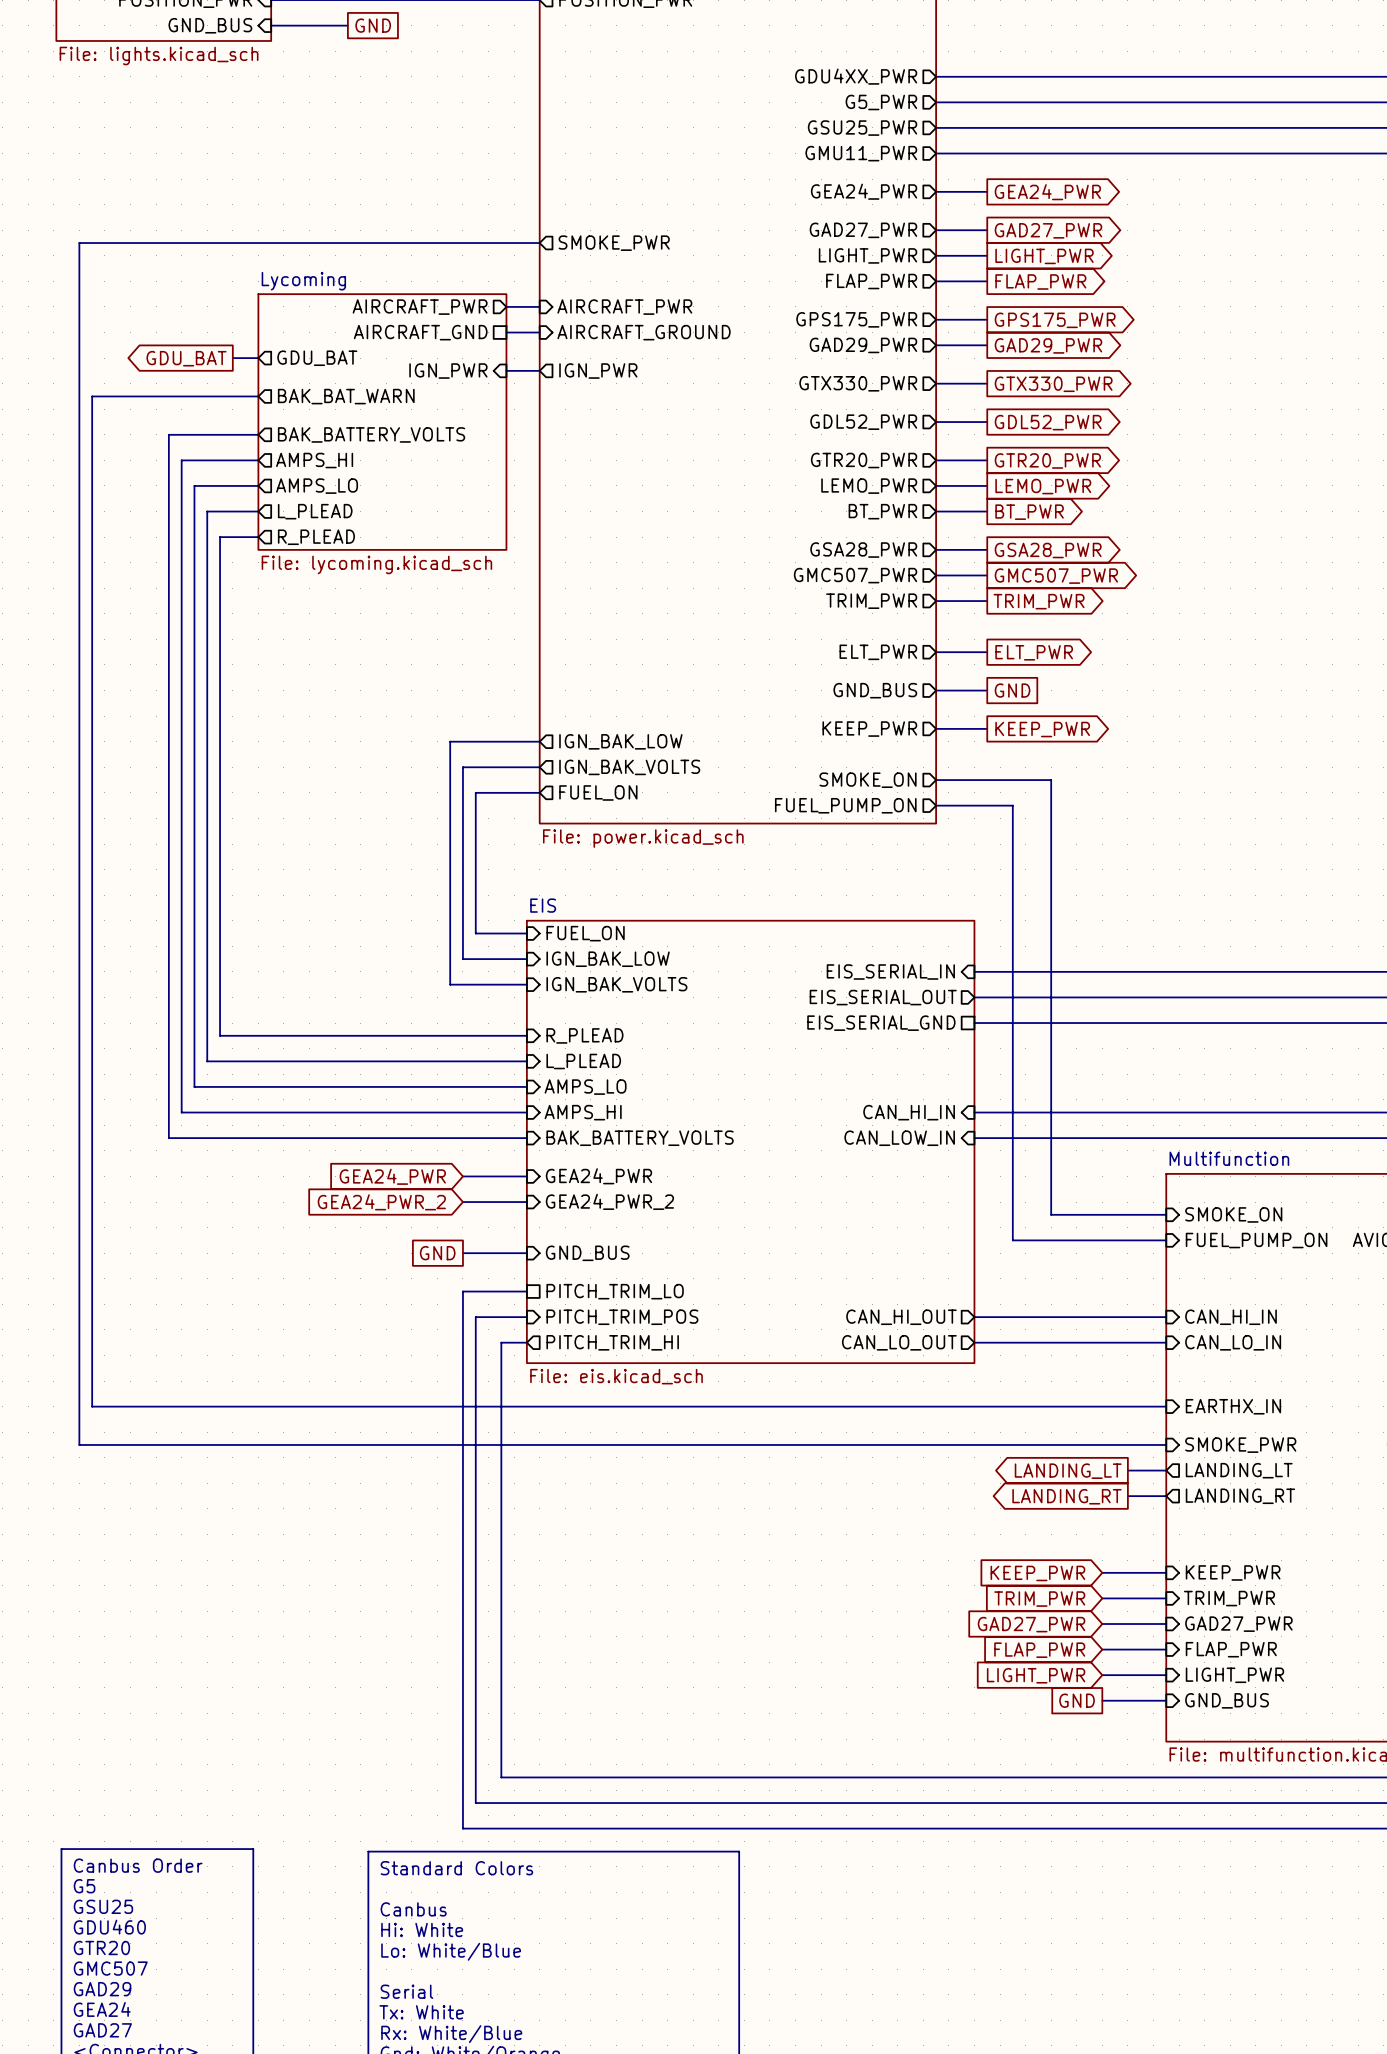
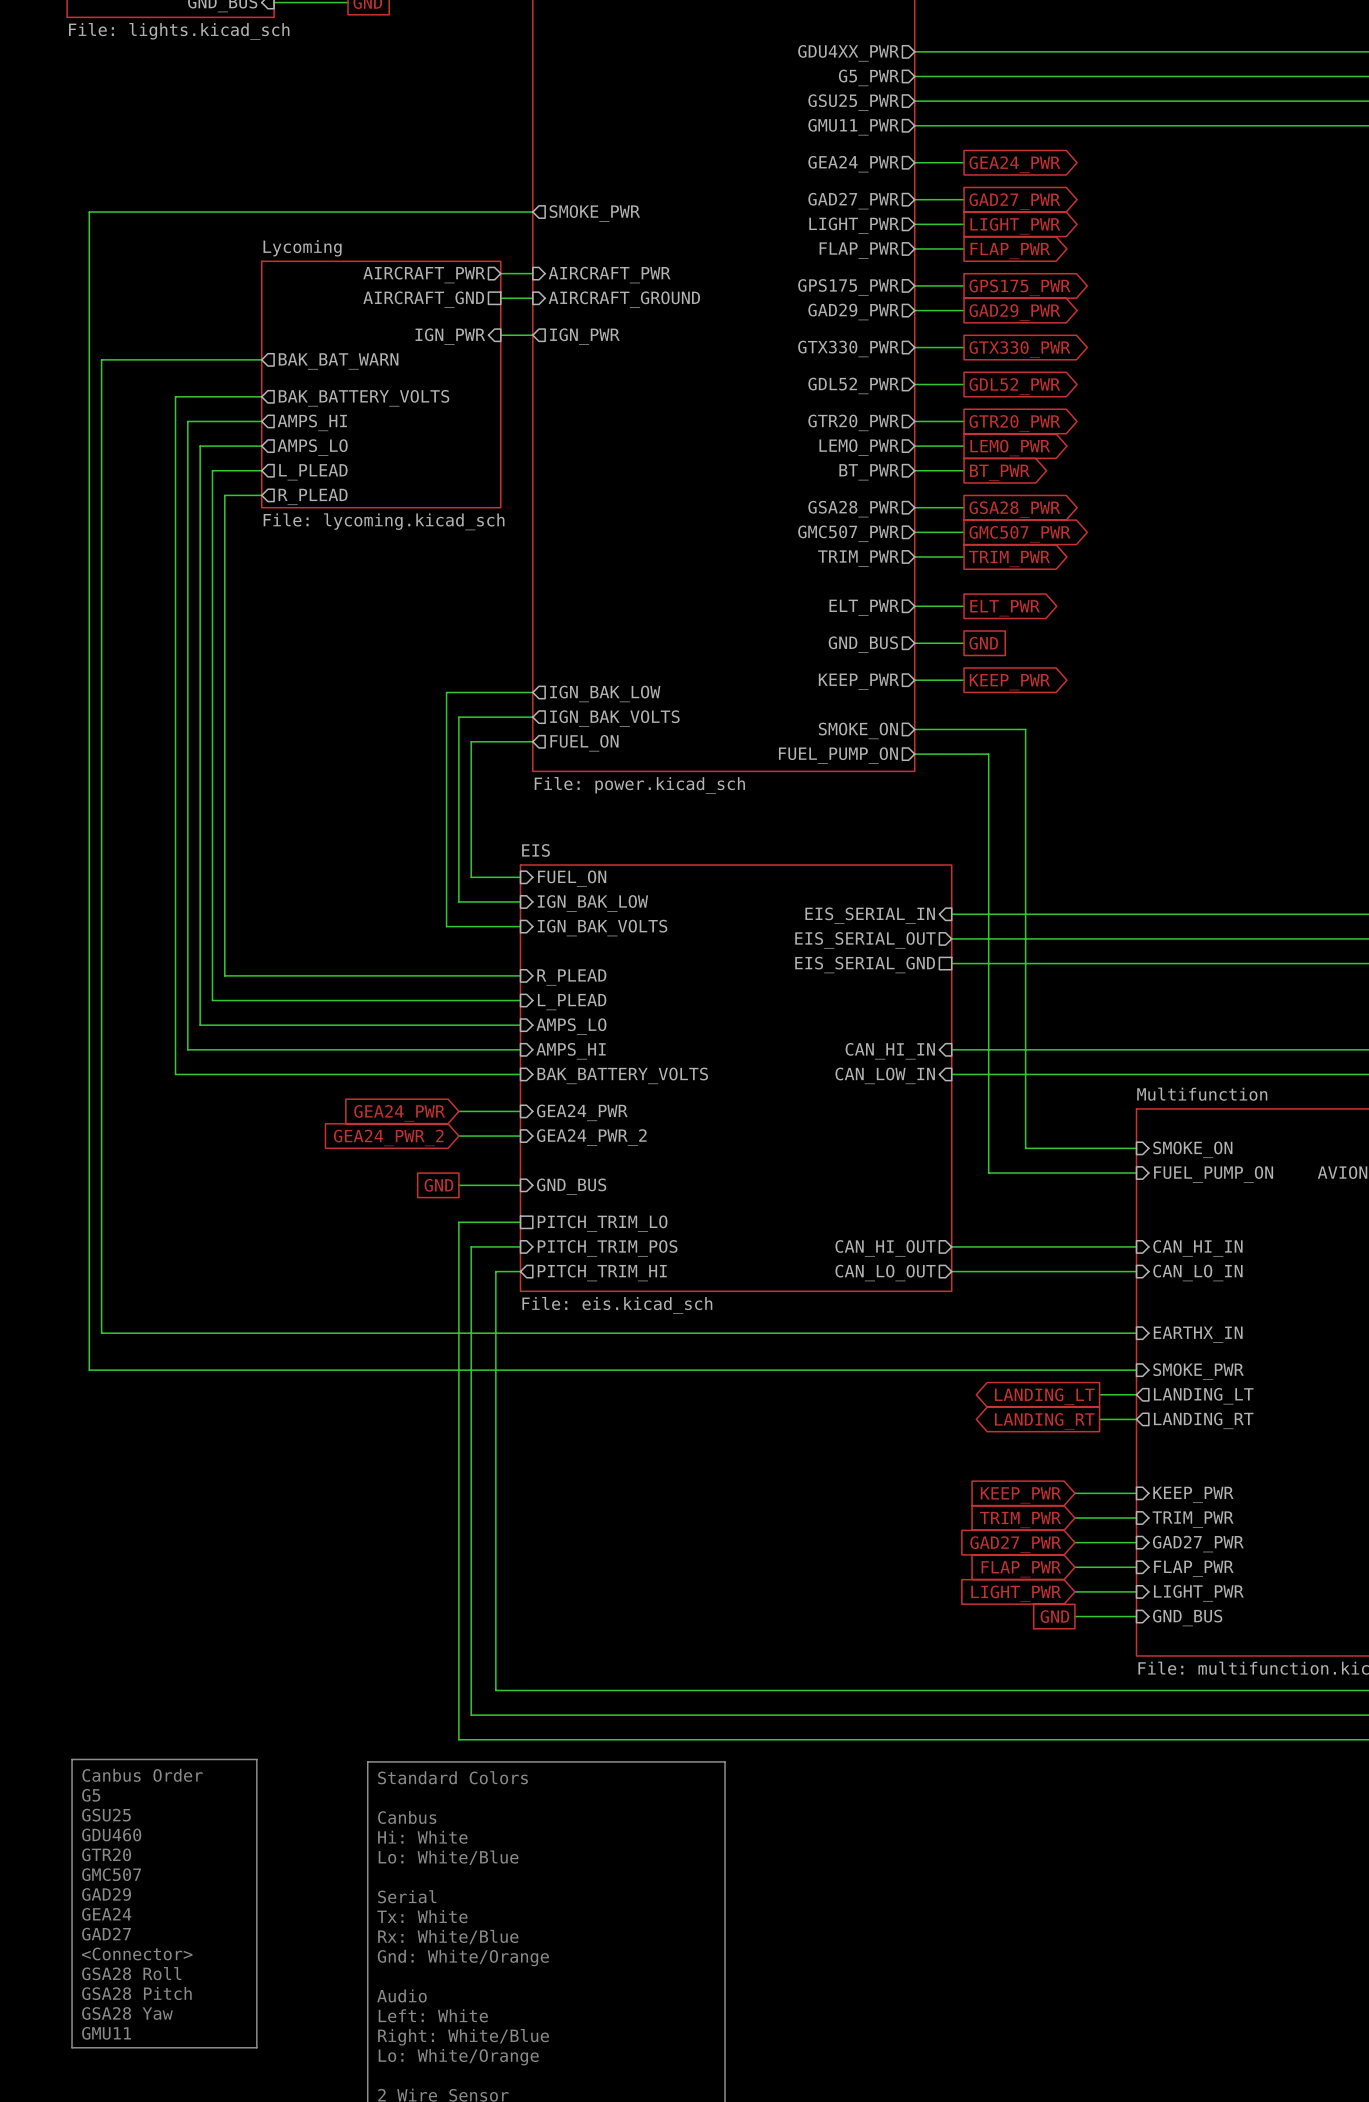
global label: GDU_BAT (186, 358) -> none
wire: (232, 358) (258, 358) -> none
sheet pin: GDU_BAT (317, 358) -> none

